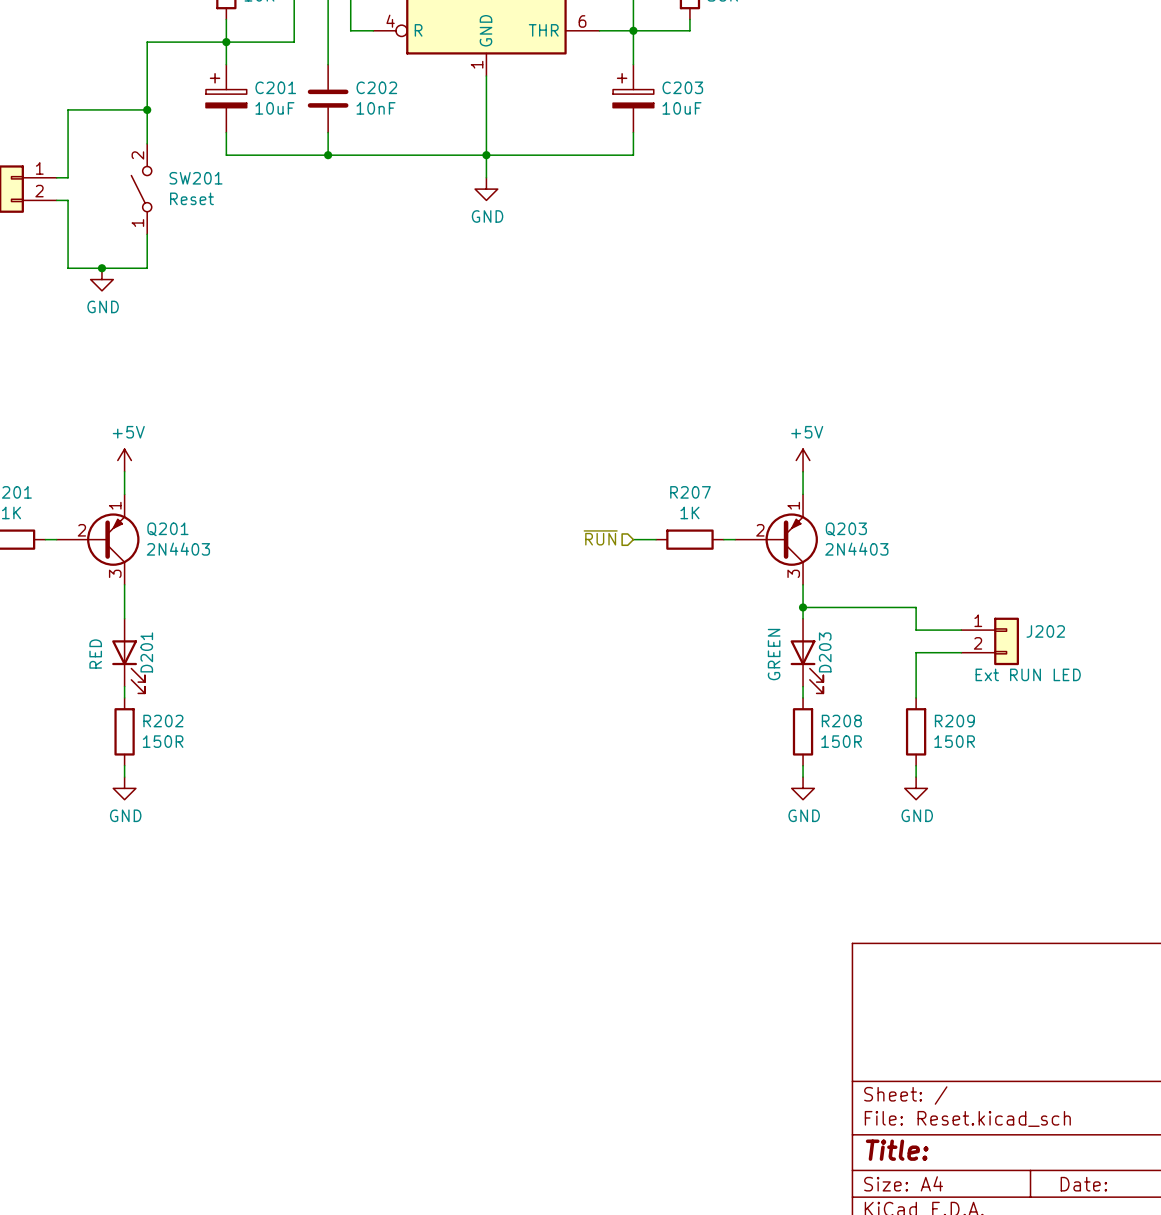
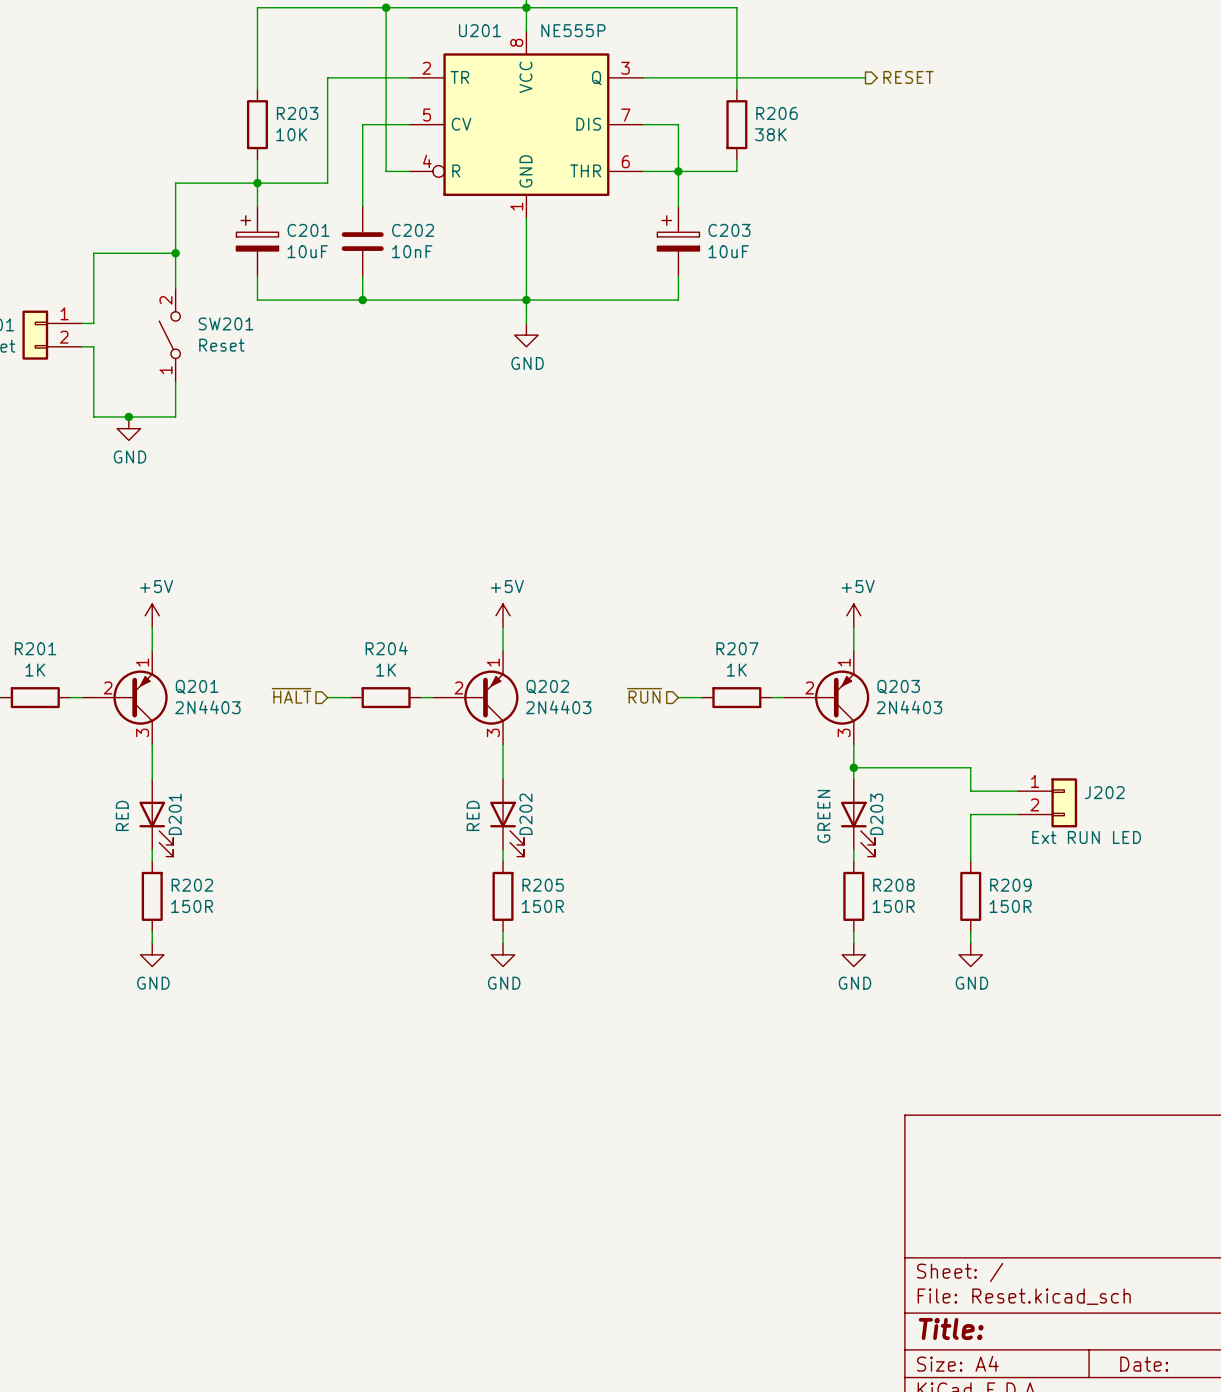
power symbol: none -> +5V (503, 615)
wire: none -> (503, 627) (503, 650)
hierarchical label: none -> ~{HALT} (291, 695)
wire: none -> (327, 697) (351, 697)
R204: none -> 1K (386, 697)
wire: none -> (421, 697) (432, 697)
Q202: none -> 2N4403 (475, 697)
wire: none -> (503, 744) (503, 779)
D202: none -> RED (507, 818)
wire: none -> (503, 849) (503, 861)
R205: none -> 150R (503, 896)
wire: none -> (503, 931) (503, 943)
power symbol: none -> GND (503, 954)

